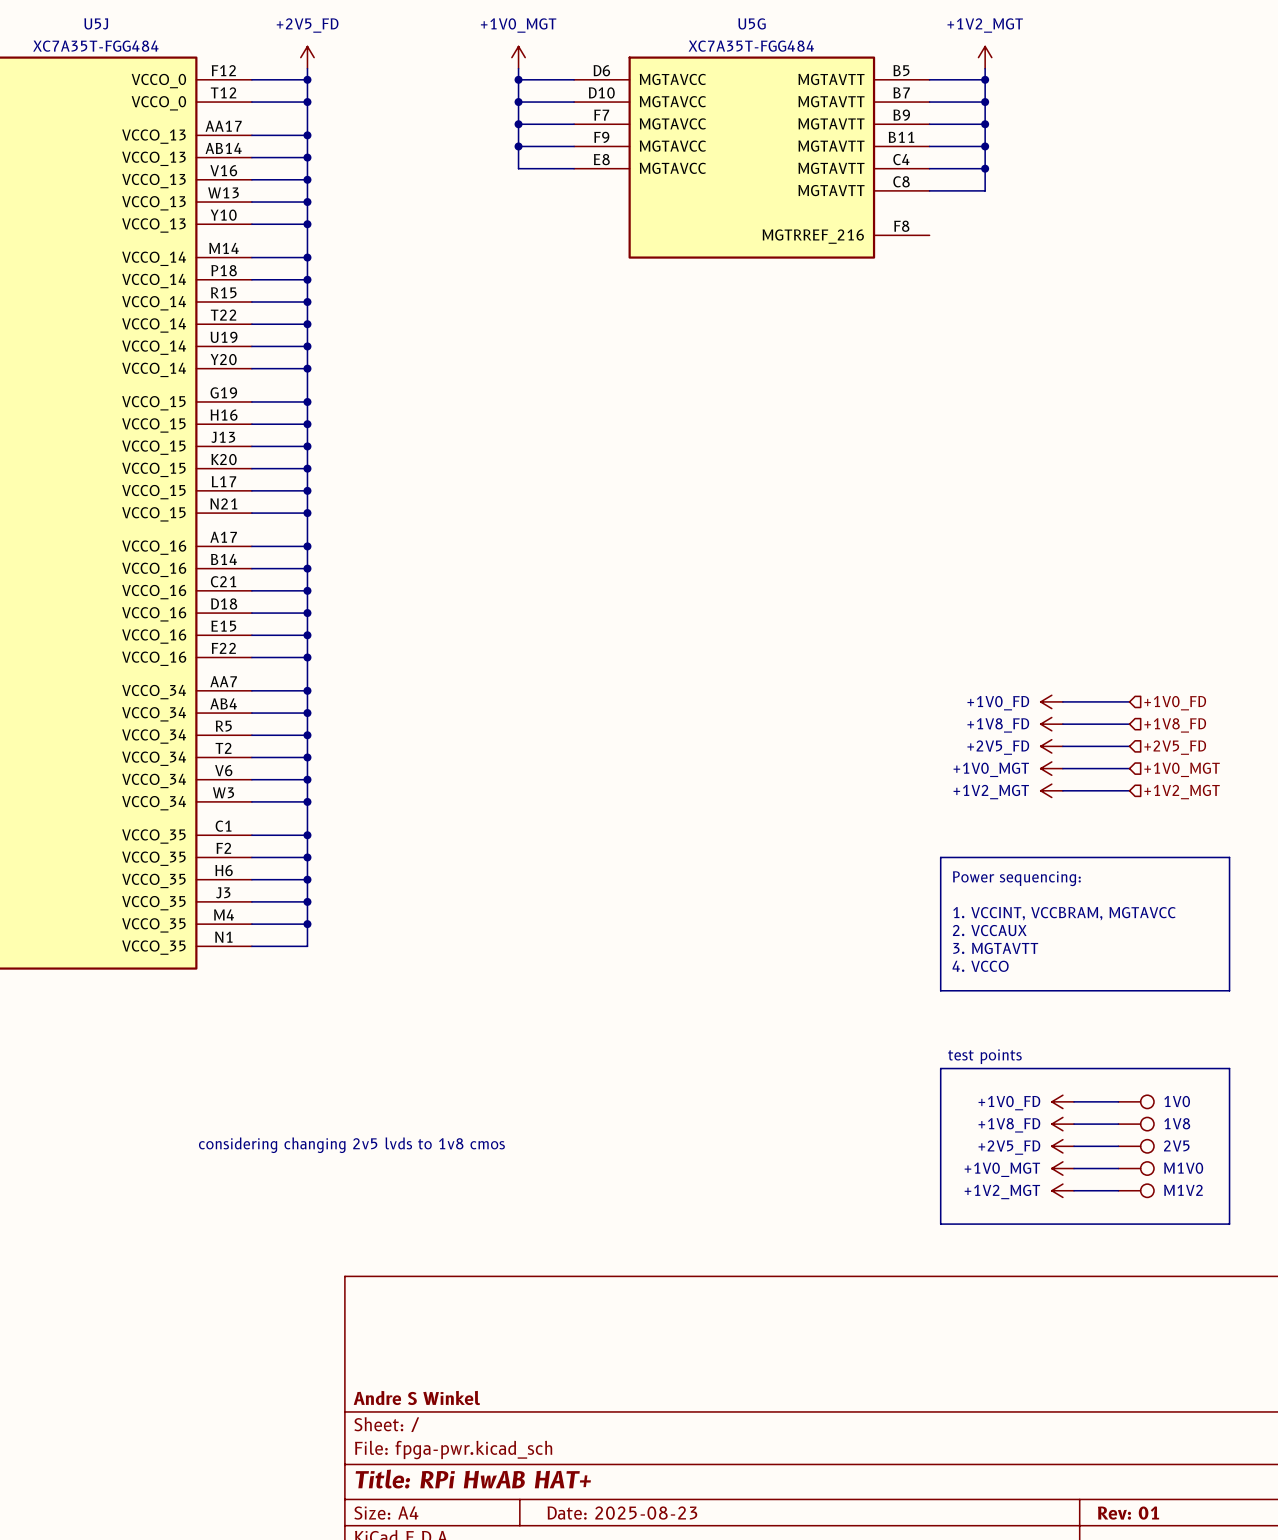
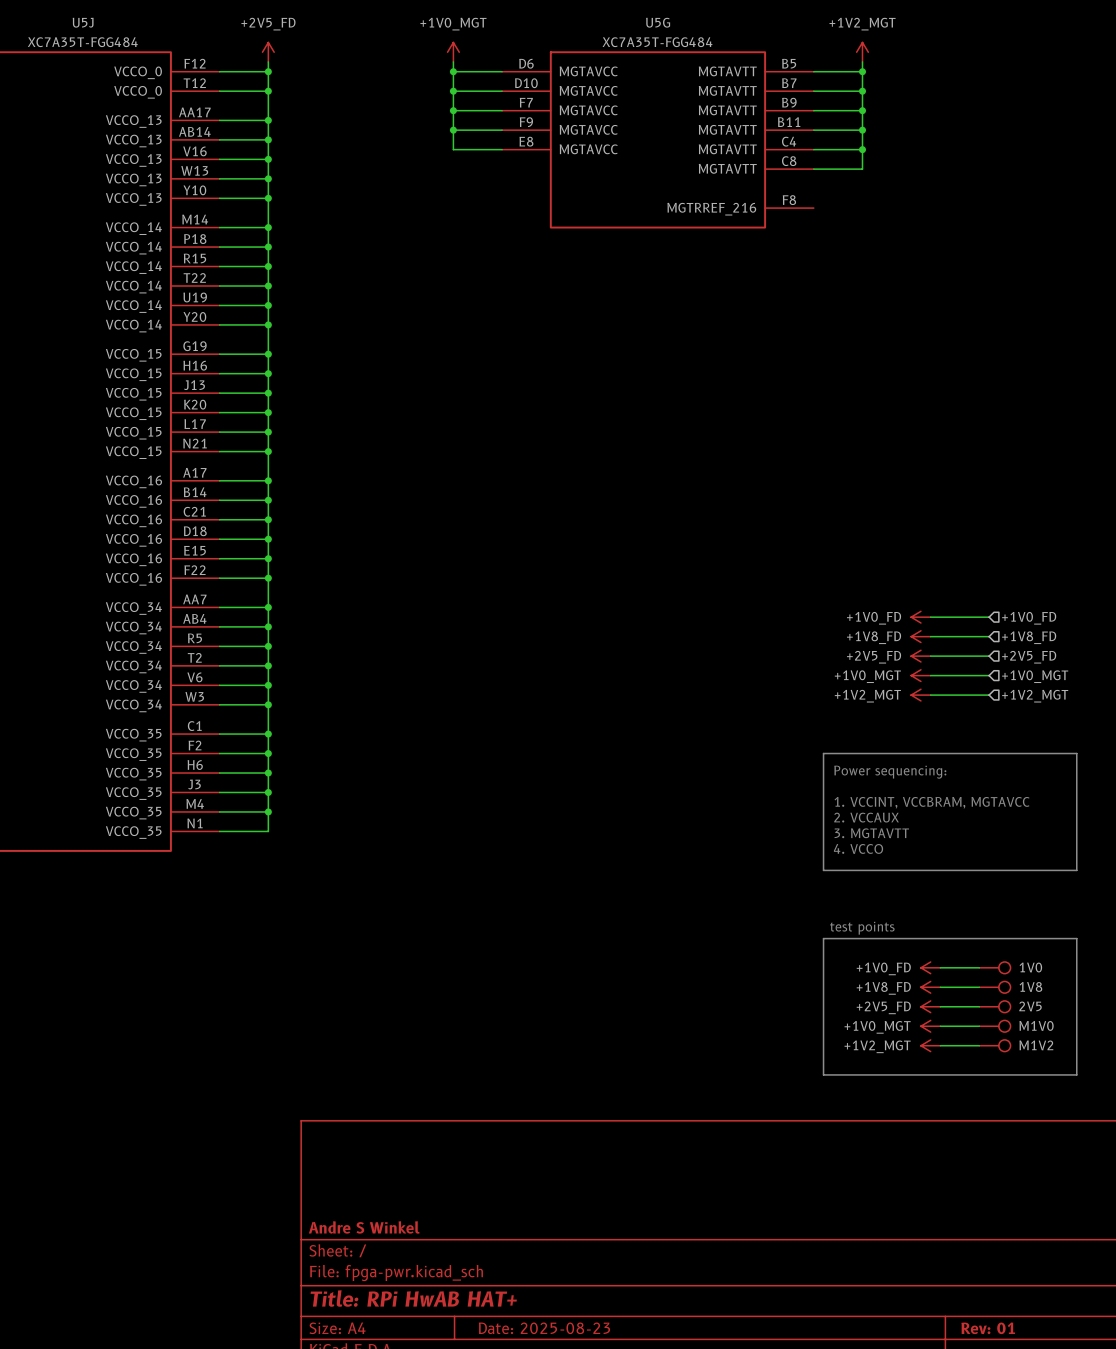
text: considering changing 2v5 lvds to 1v8 cmos (351, 1145) -> none

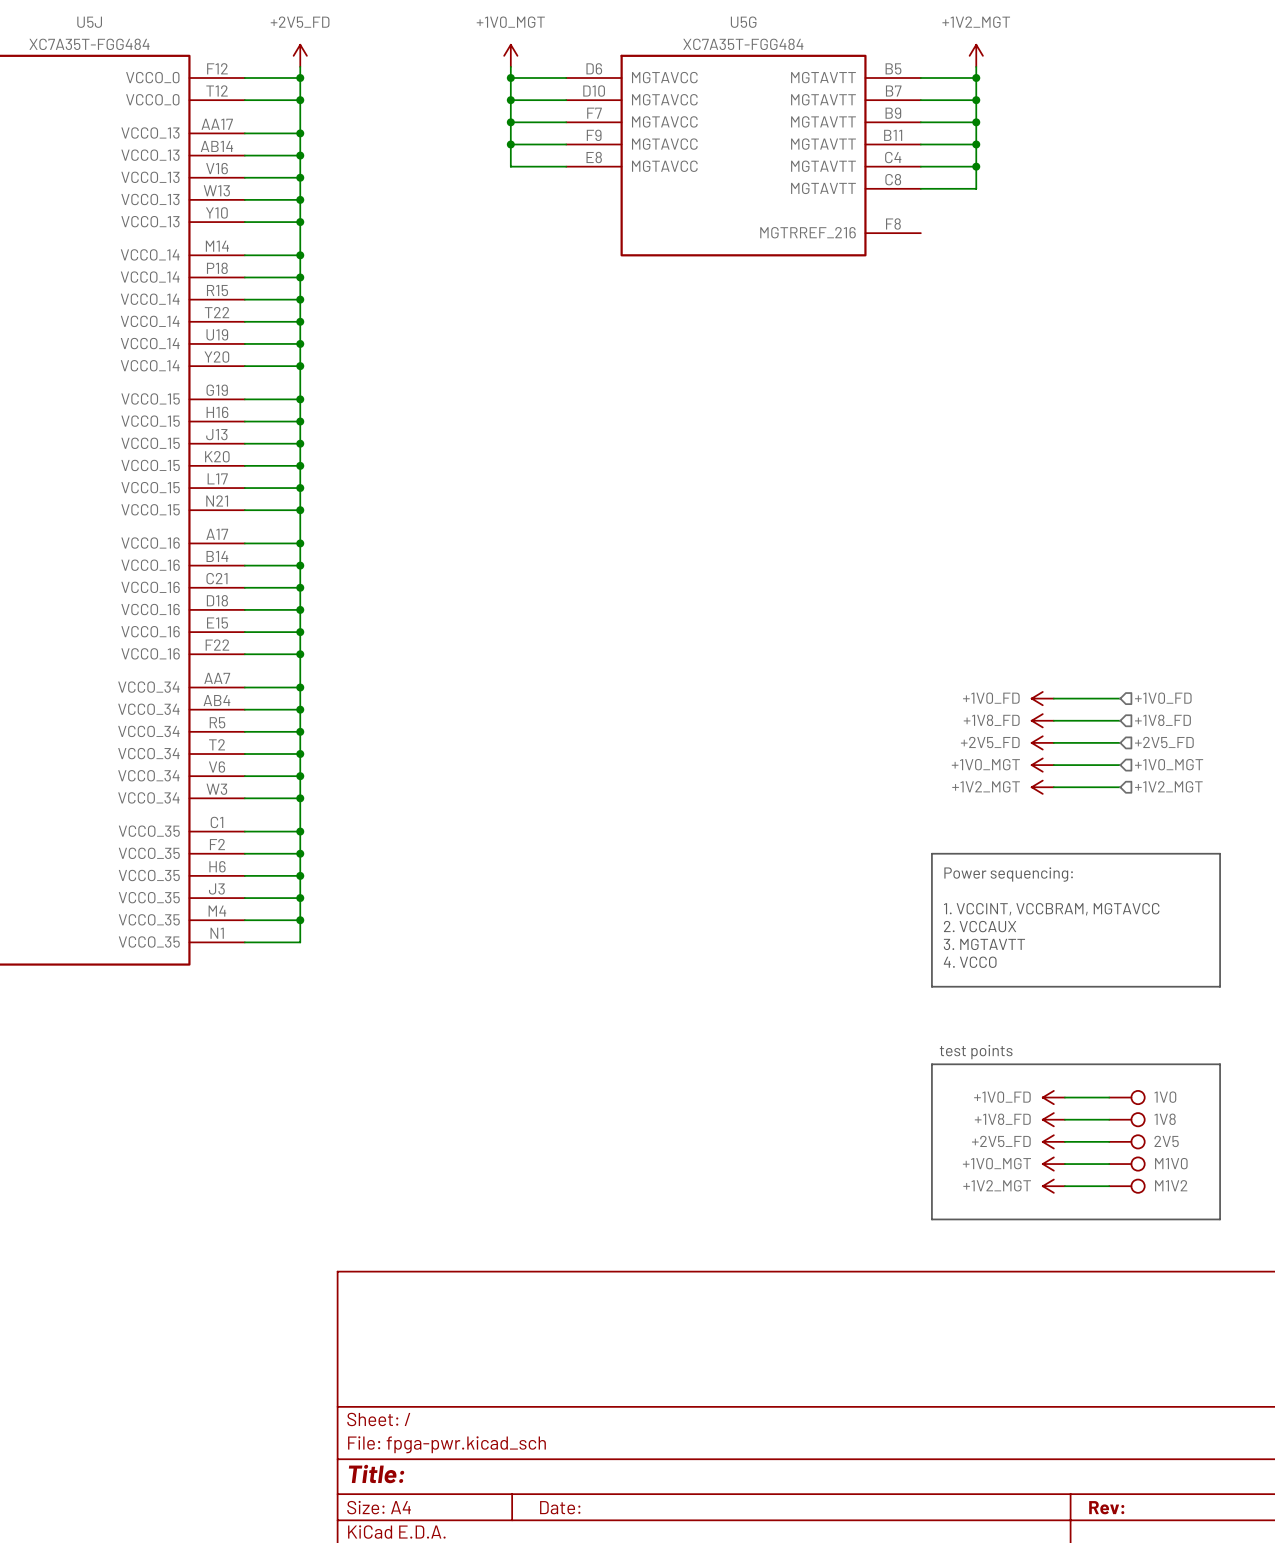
title block: Andre S Winkel (364, 1227) -> none
title block: Title: RPi HwAB HAT+ (413, 1298) -> Title: (376, 1474)
title block: Date: 2025-08-23 (544, 1328) -> Date: (560, 1507)
title block: Rev: 01 (988, 1328) -> Rev: (1106, 1507)

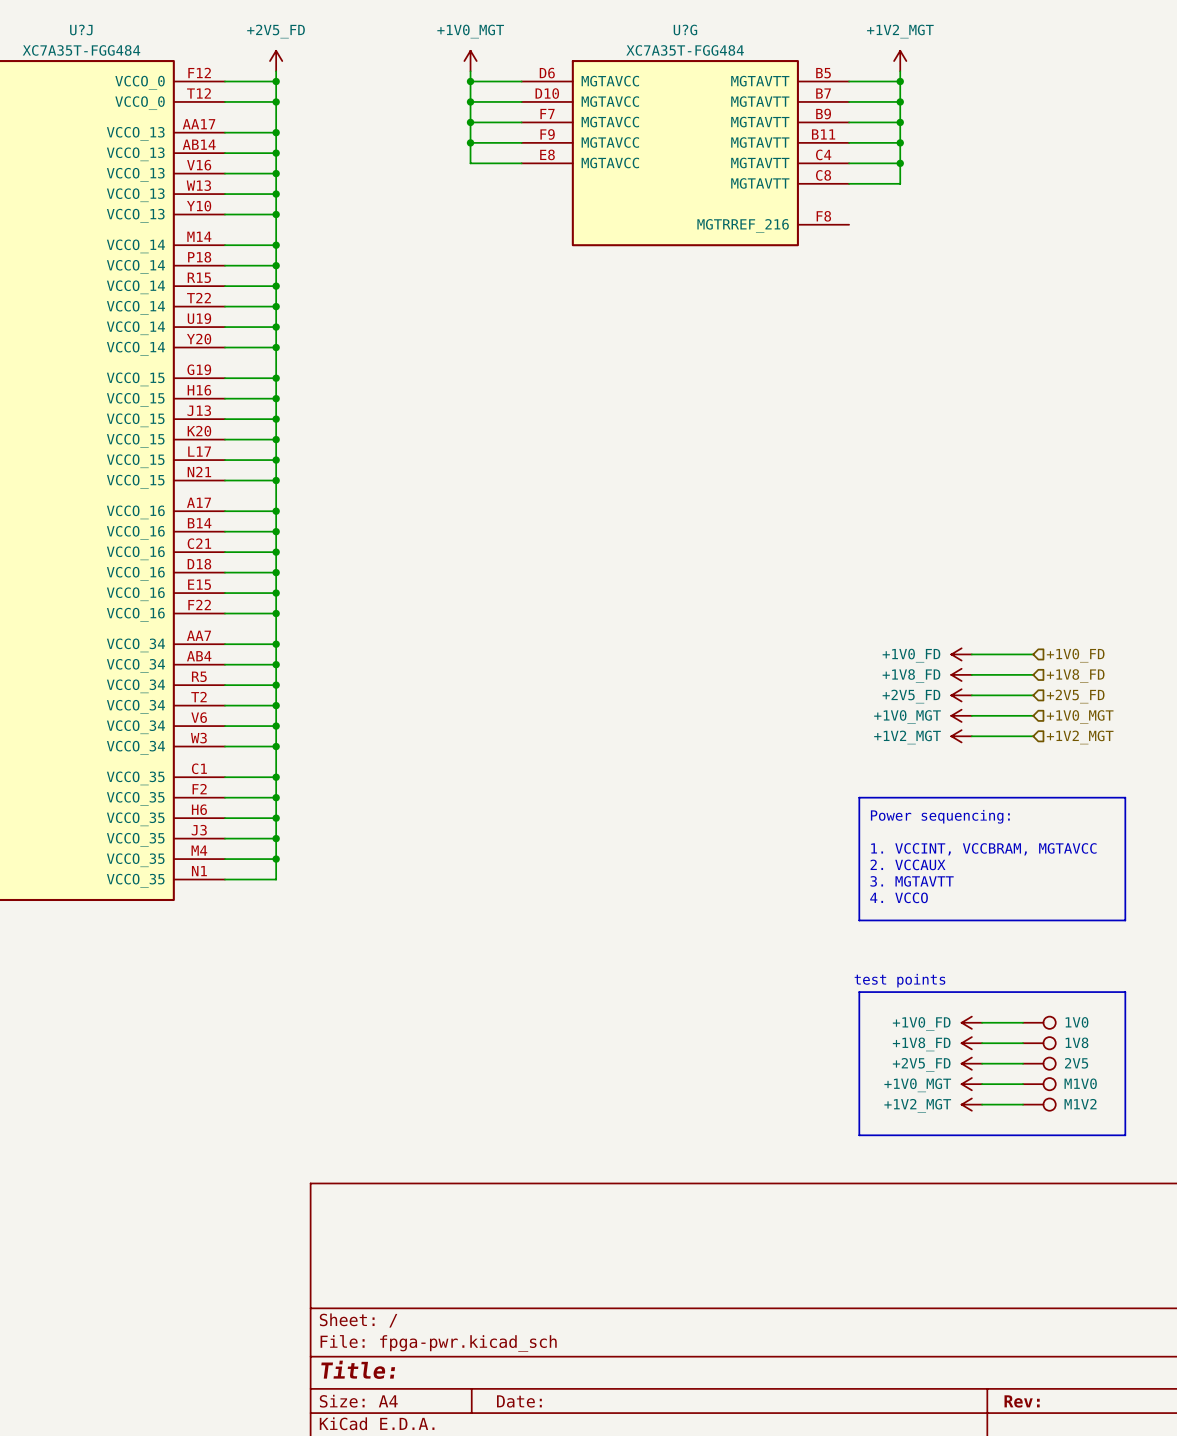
U5J name: U5J (89, 22) -> U?J (81, 29)
U5G name: U5G (743, 22) -> U?G (685, 29)

